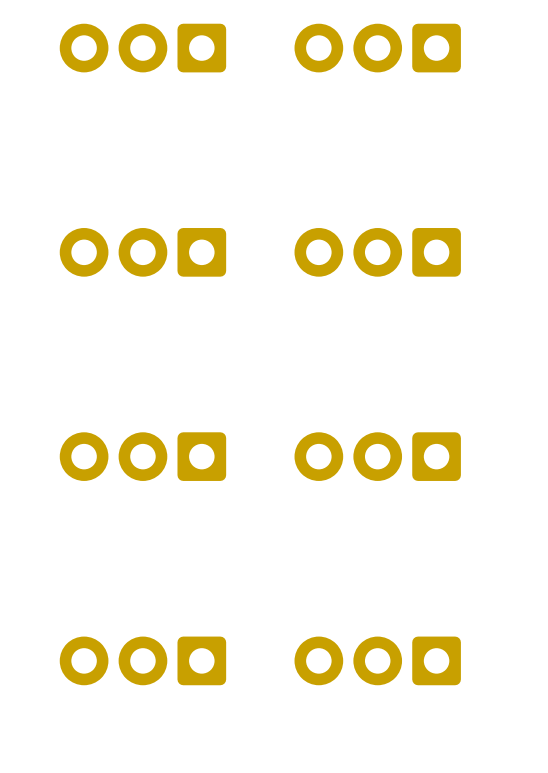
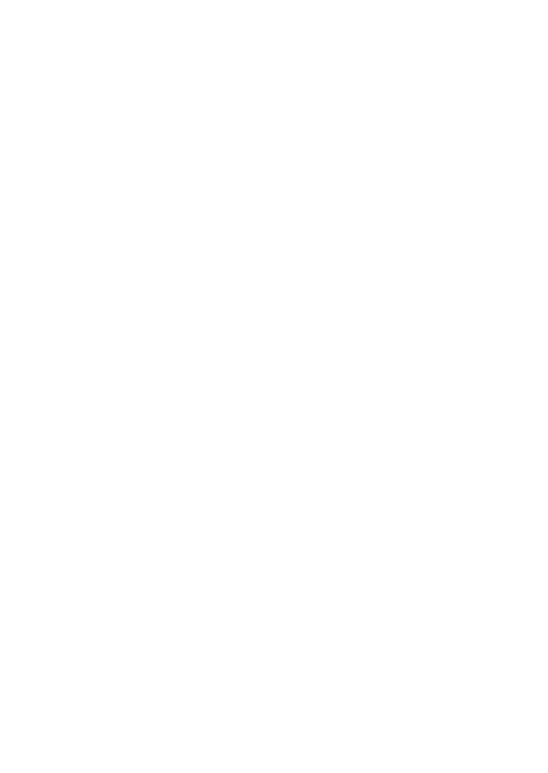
part: (142, 48) -> none
part: (377, 48) -> none
part: (142, 252) -> none
part: (377, 252) -> none
part: (142, 456) -> none
part: (377, 456) -> none
part: (142, 660) -> none
part: (377, 660) -> none

